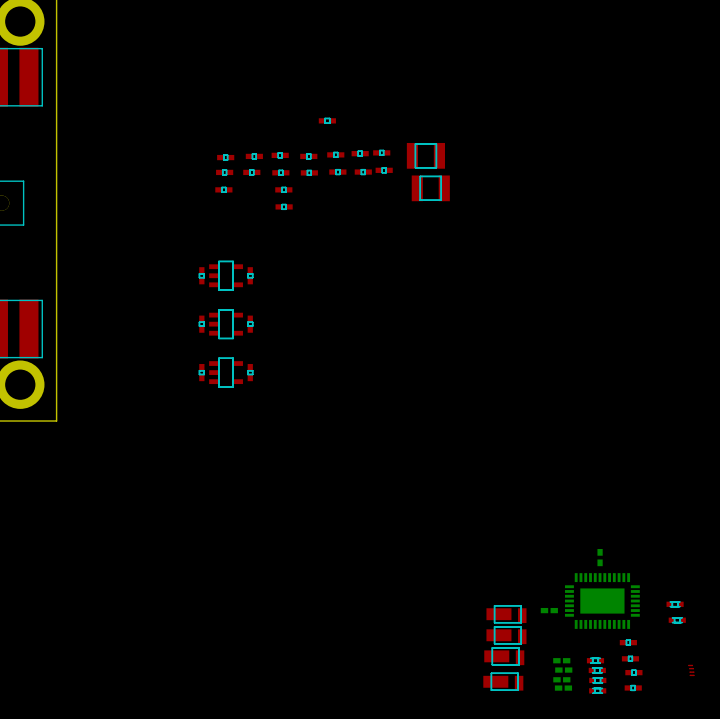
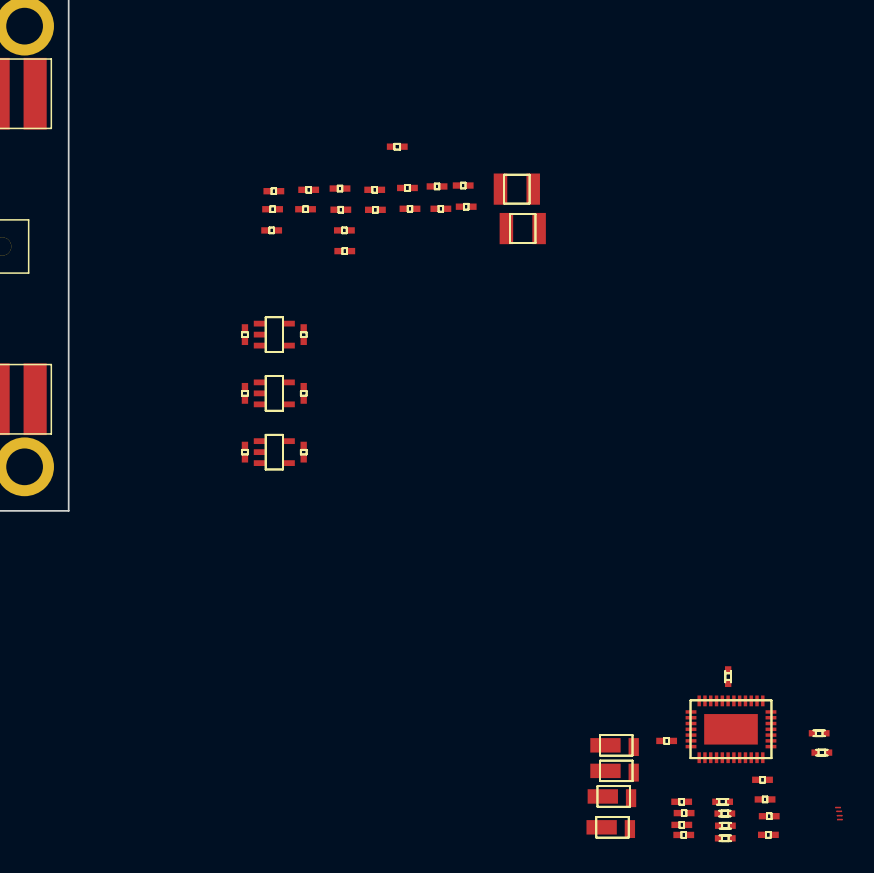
part side: bottom (600, 557) -> top (728, 676)
part side: bottom (602, 601) -> top (730, 729)
part side: bottom (549, 610) -> top (666, 740)
part side: bottom (561, 660) -> top (681, 801)
part side: bottom (563, 670) -> top (684, 813)
part side: bottom (561, 679) -> top (681, 824)
part side: bottom (563, 688) -> top (683, 834)

